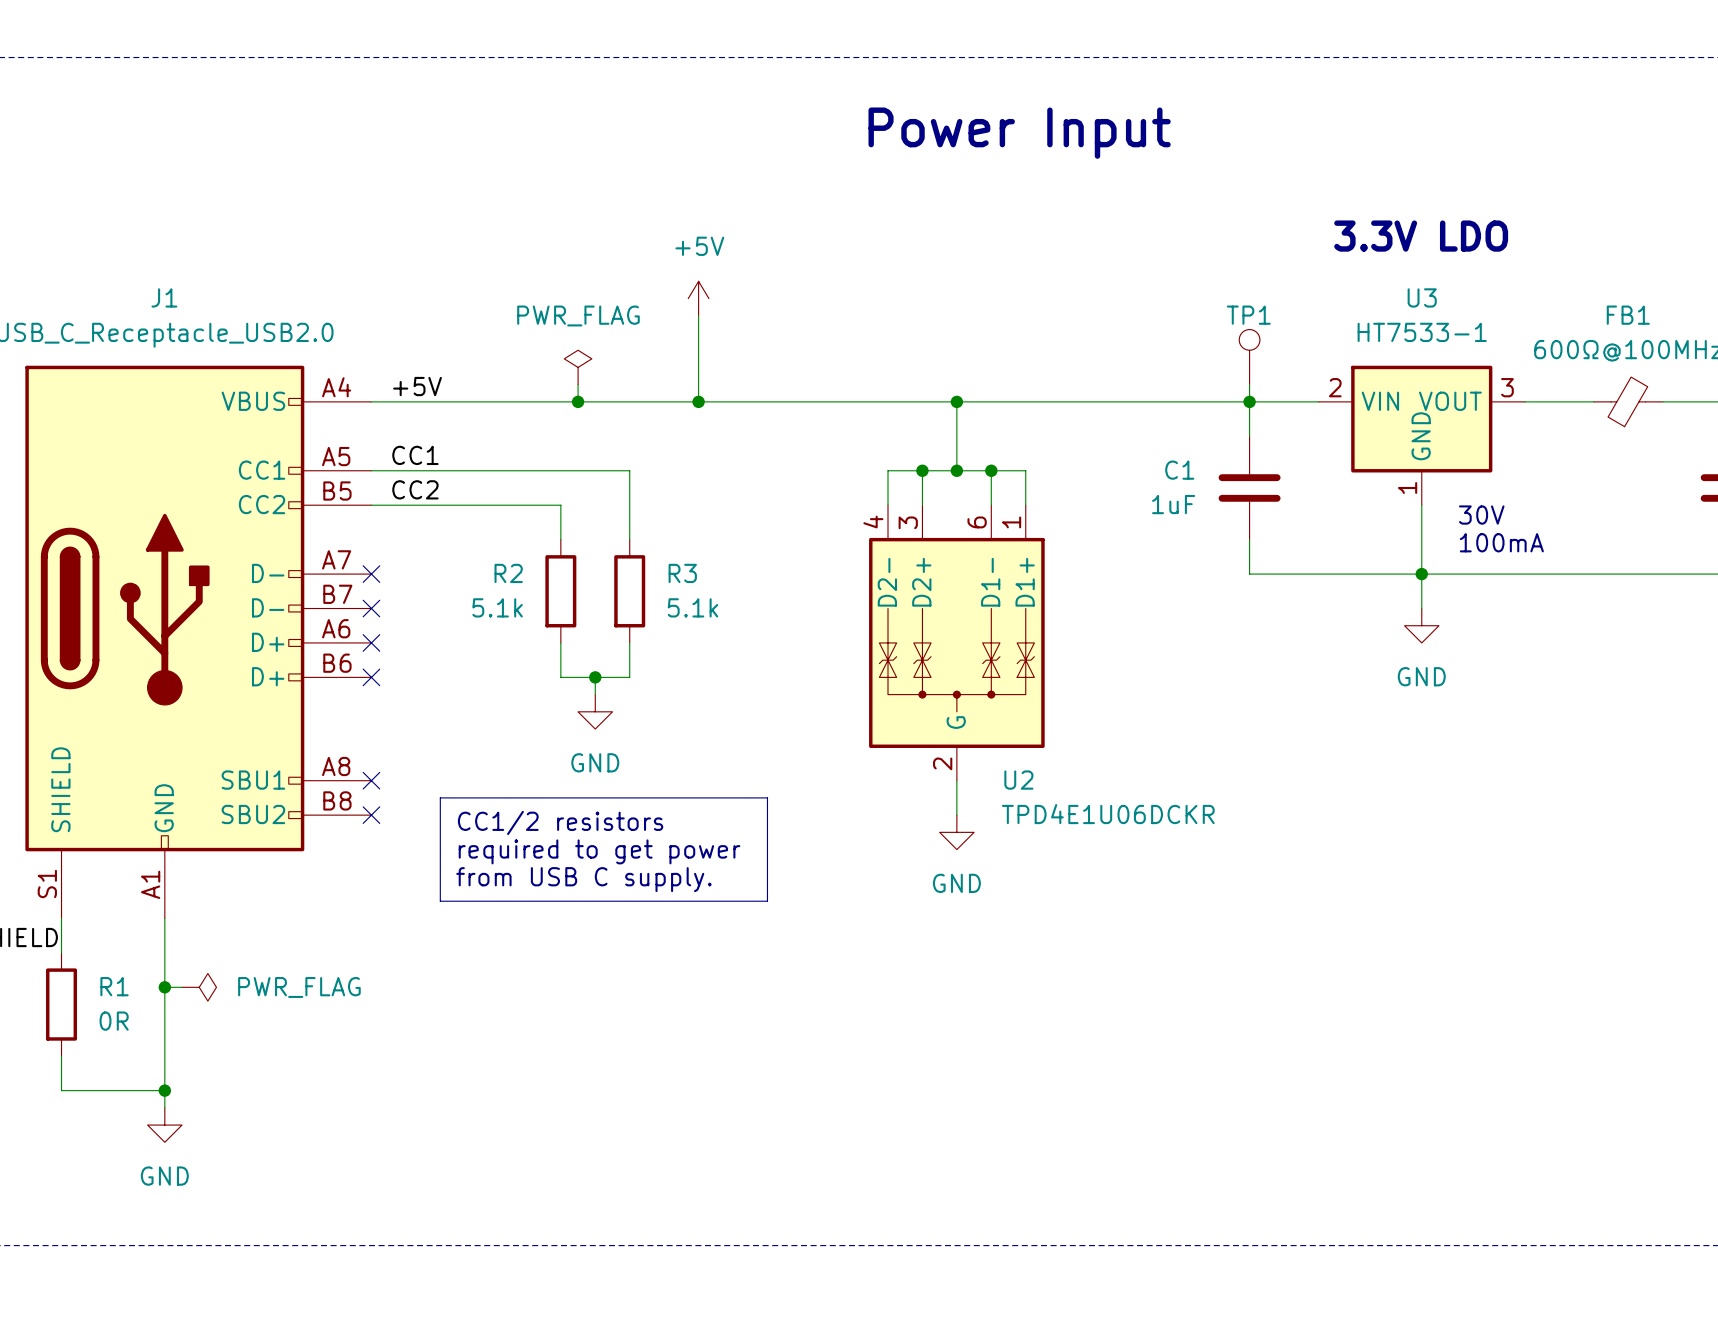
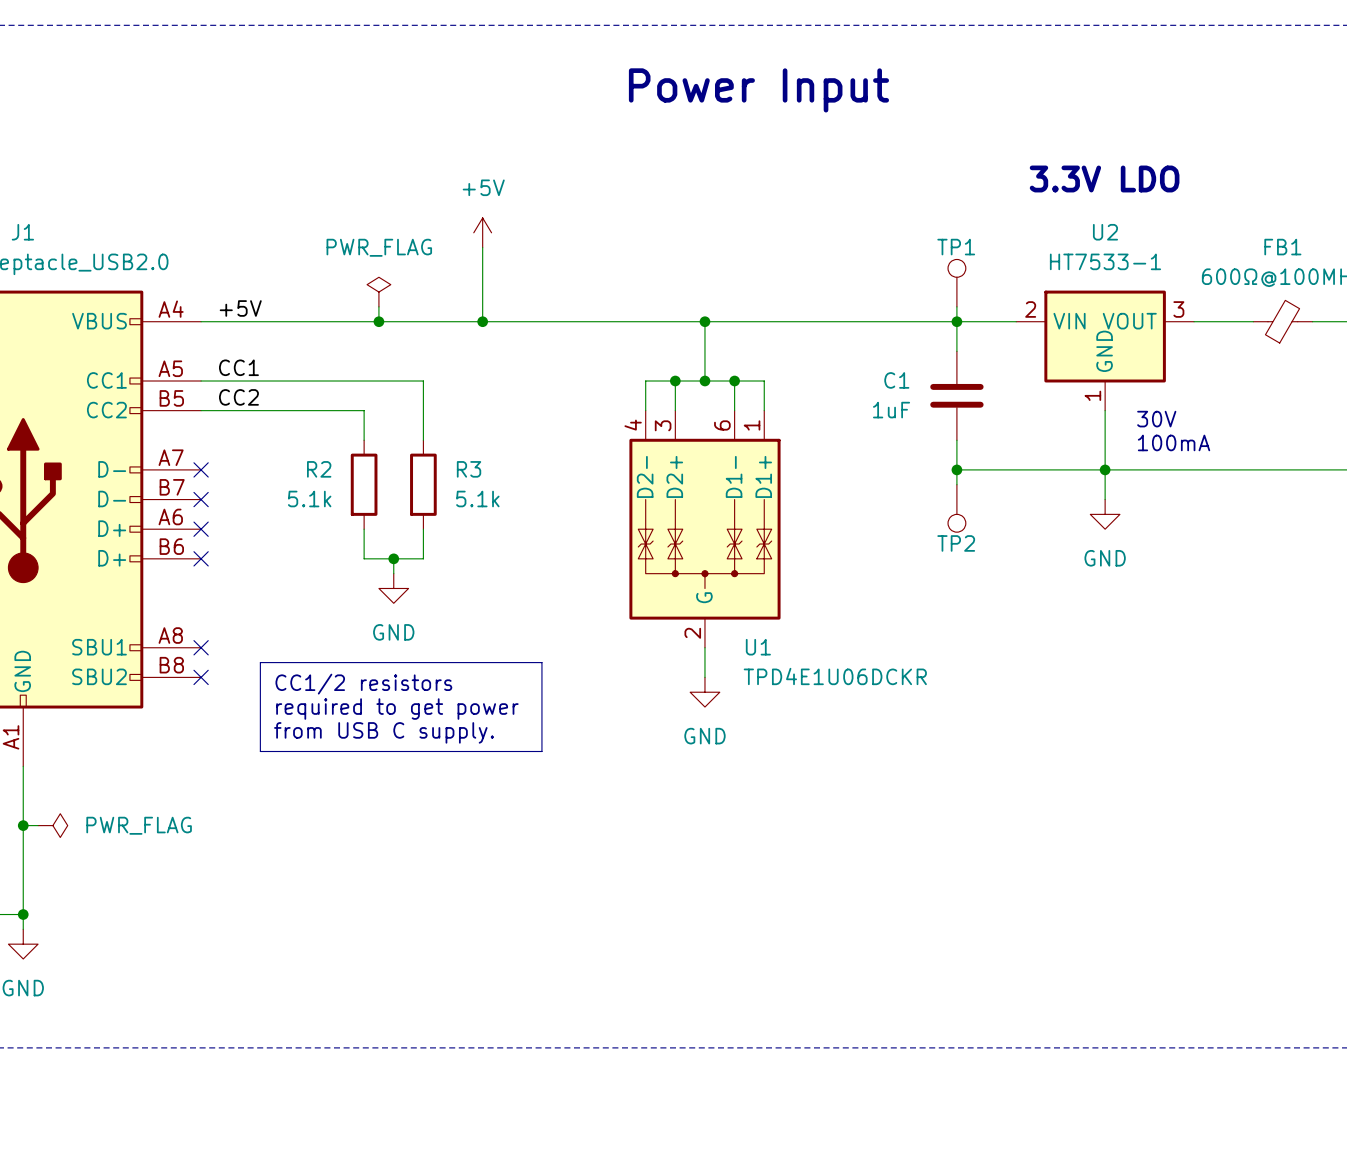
U3 name: U3 (1422, 297) -> U2 (1105, 232)
wire: none -> (956, 469) (956, 484)
junction: none -> (956, 469)
TP2: none -> (956, 508)
U2 name: U2 (1018, 780) -> U1 (758, 647)

